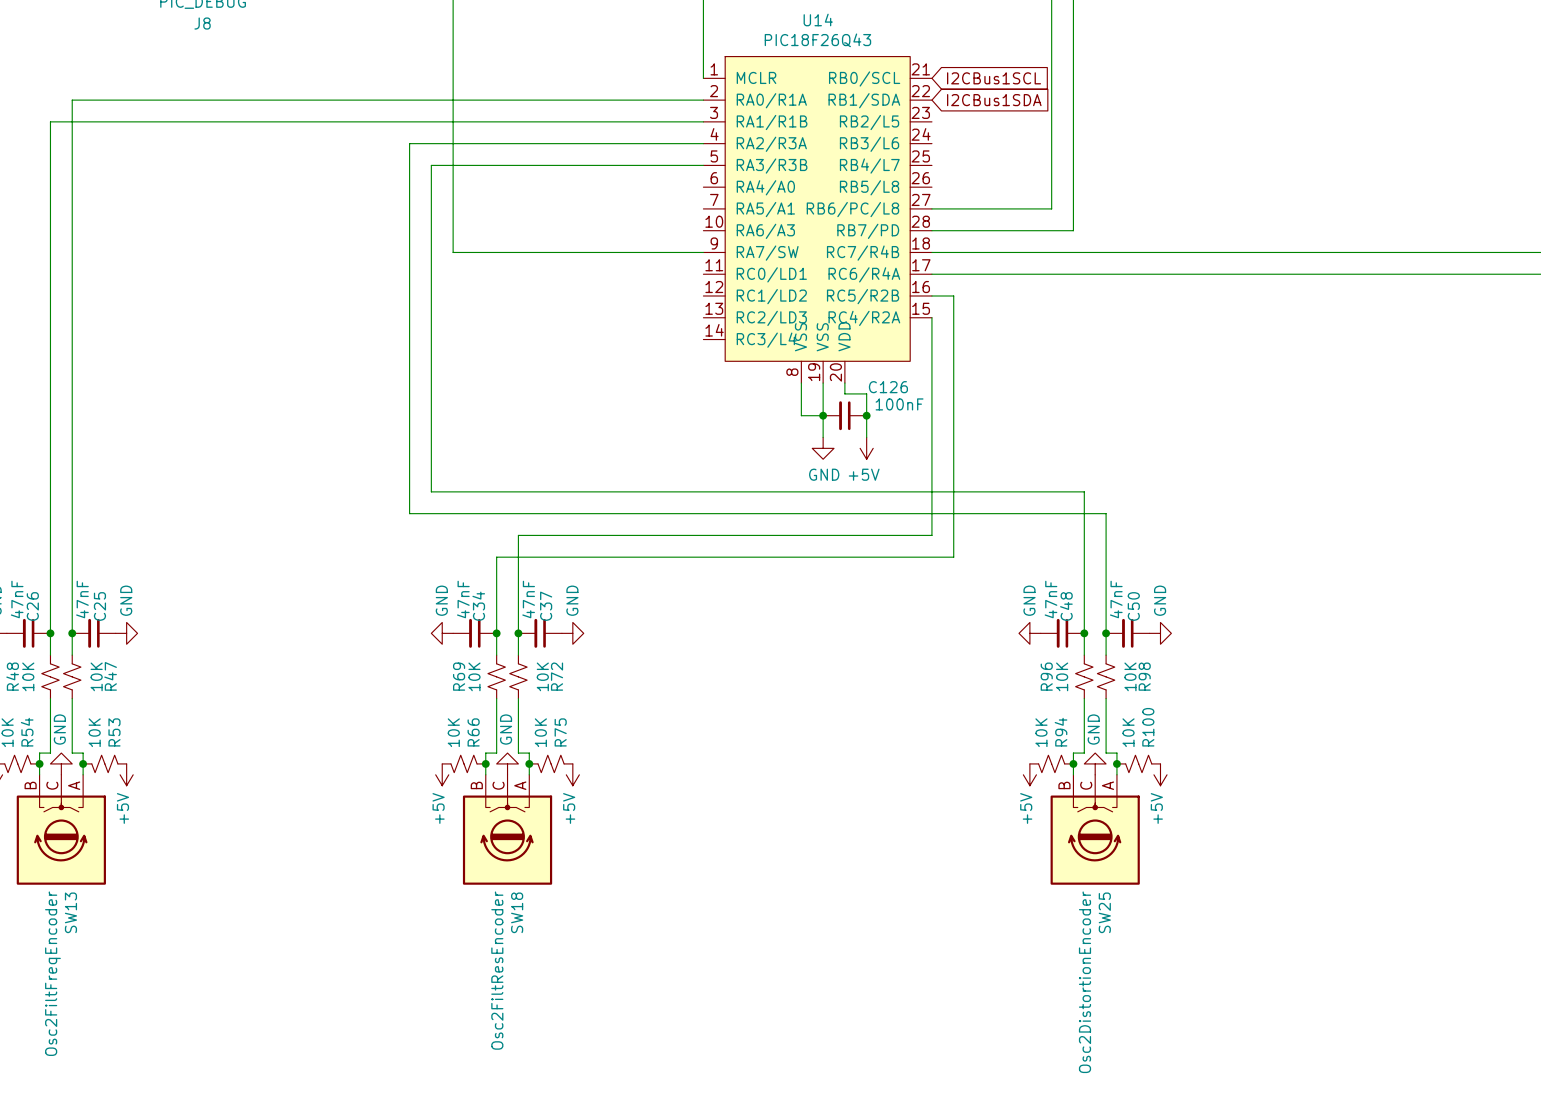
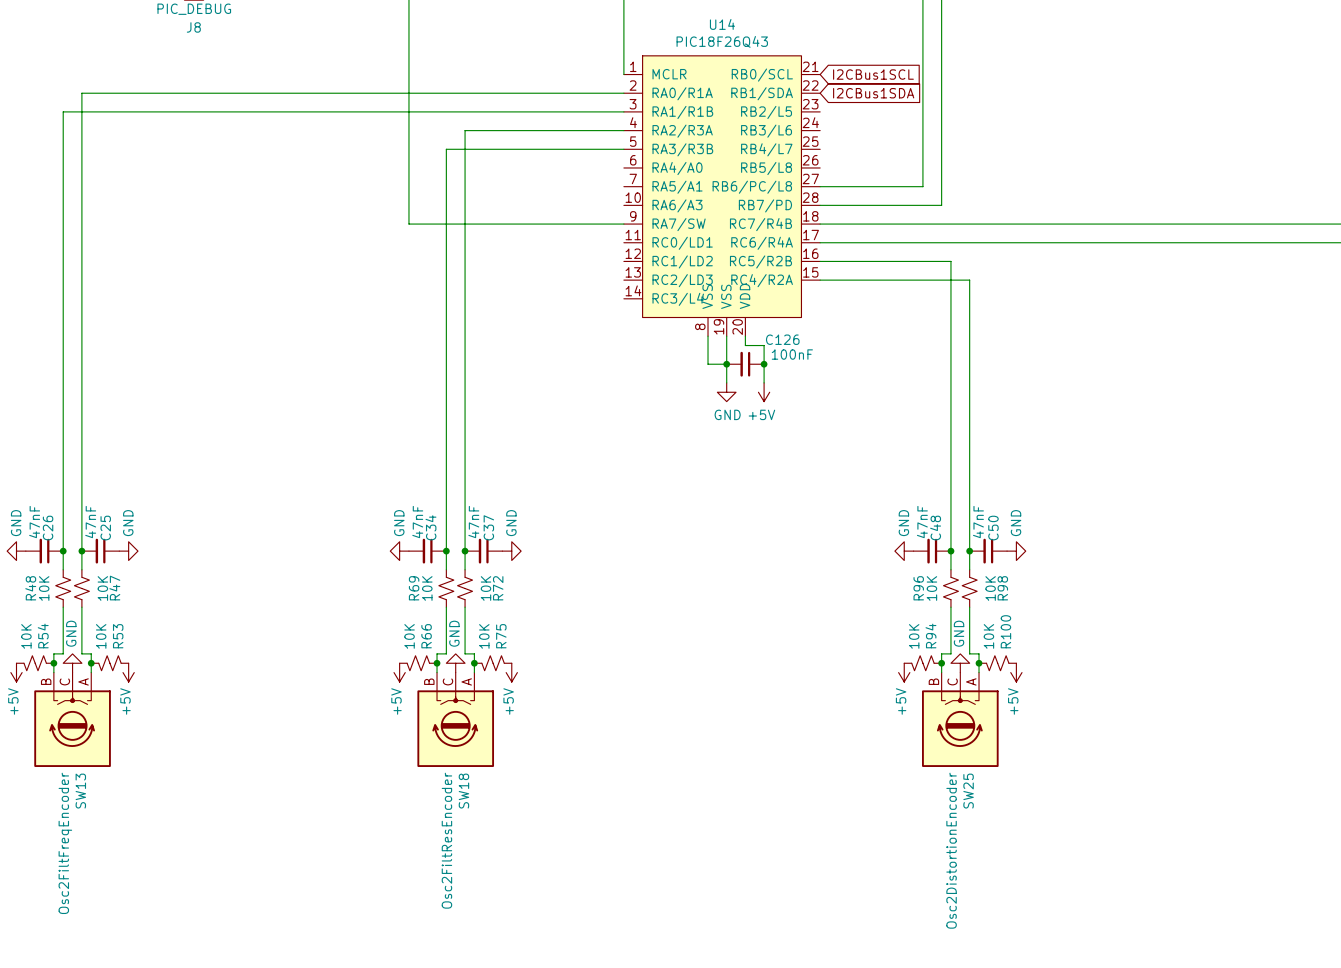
wire: (518, 143) (409, 143) (409, 513) (1106, 513) -> (820, 280) (969, 280) (969, 448)
wire: (496, 165) (431, 165) (431, 491) (1084, 491) -> (838, 261) (950, 261) (950, 429)
wire: (953, 295) (953, 557) (496, 557) -> (446, 149) (446, 485)
wire: (931, 317) (931, 535) (518, 535) -> (465, 130) (465, 467)

